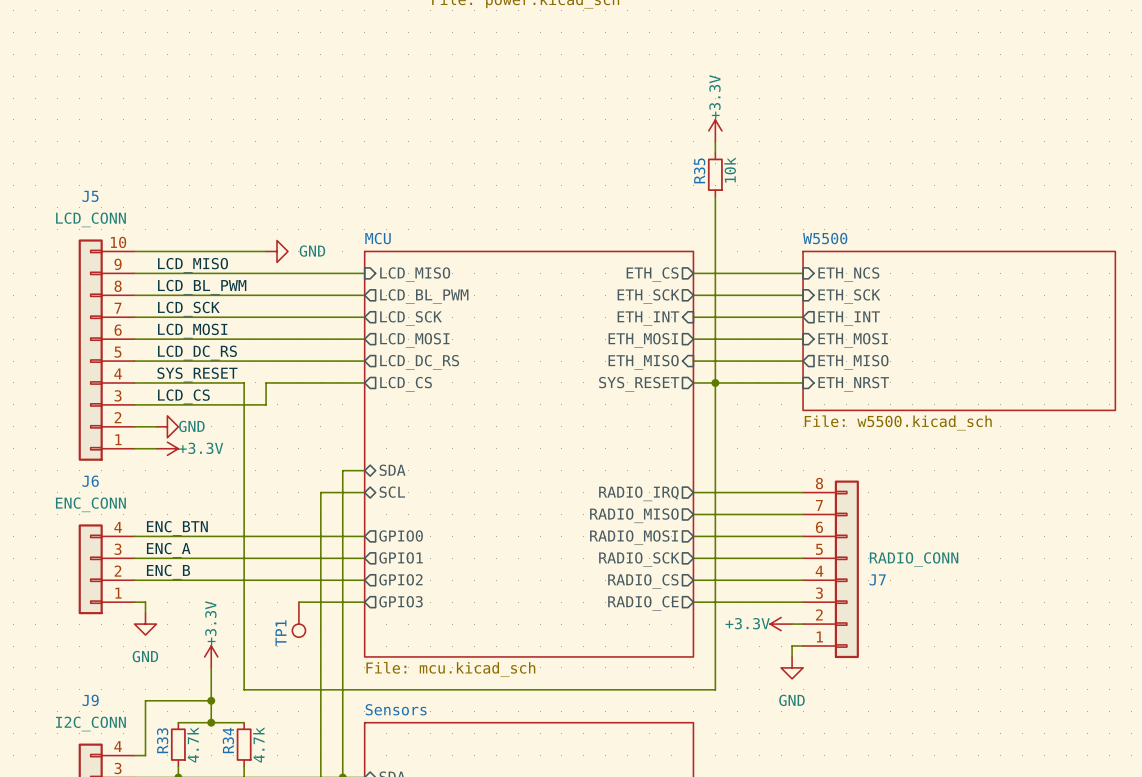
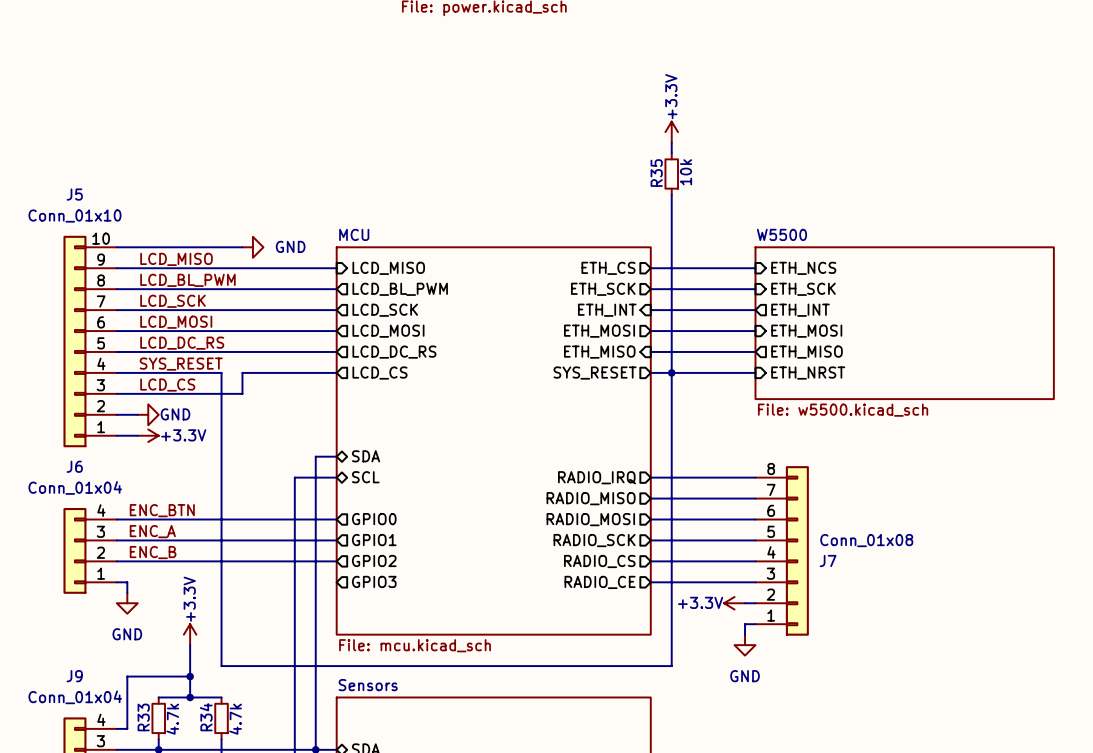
J5 value: LCD_CONN (90, 219) -> Conn_01x10 (74, 215)
J6 value: ENC_CONN (90, 504) -> Conn_01x04 (75, 487)
J7 value: RADIO_CONN (914, 559) -> Conn_01x08 (866, 540)
wire: (298, 602) (364, 602) -> none
TP1: (298, 619) -> none
J9 value: I2C_CONN (90, 723) -> Conn_01x04 (75, 697)

